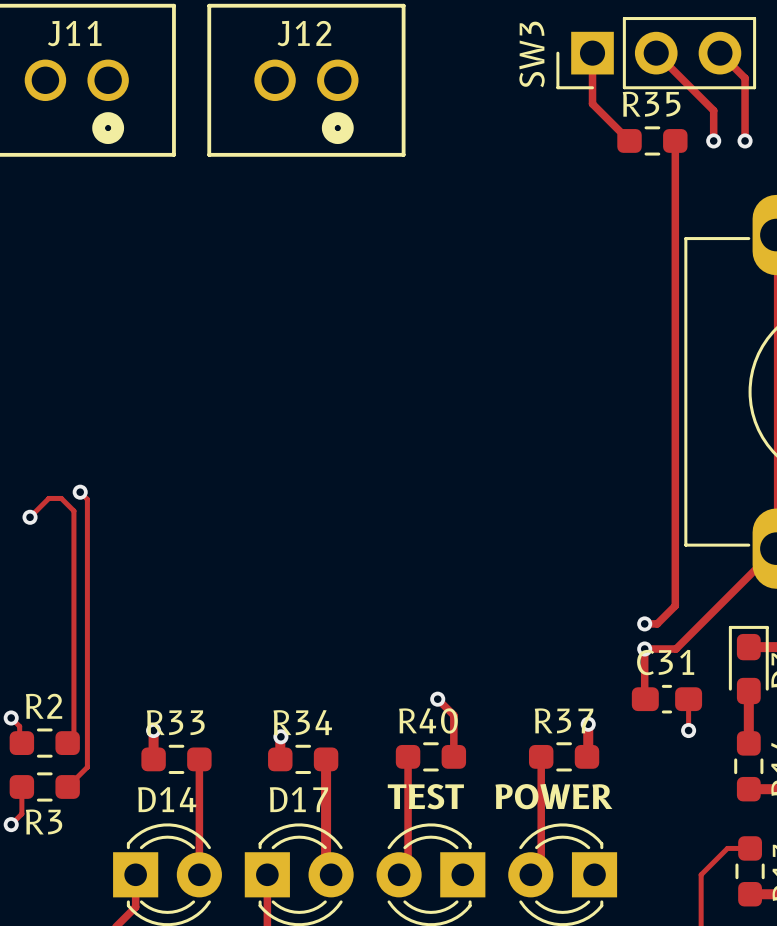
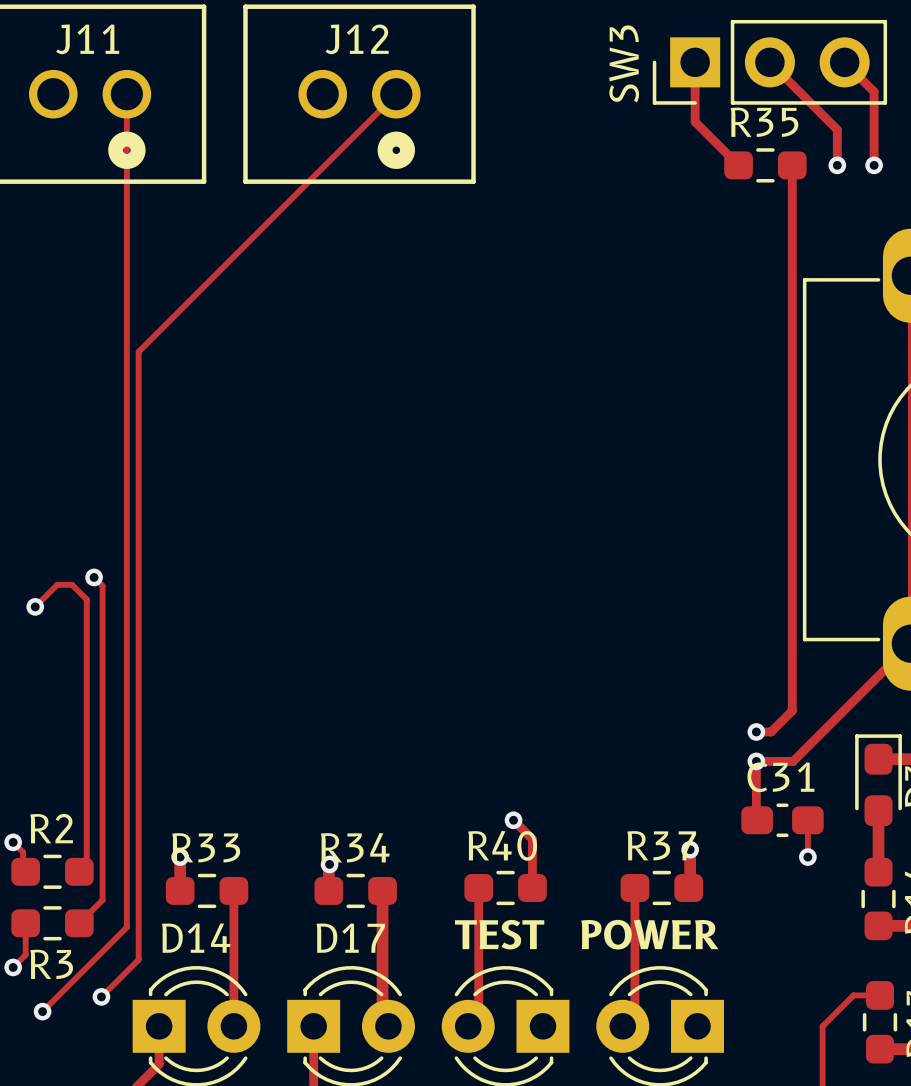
track: none -> (126, 94) (126, 927) (42, 1011)
track: none -> (396, 94) (138, 351) (138, 959) (101, 996)
via: none -> (101, 996)
via: none -> (42, 1011)

